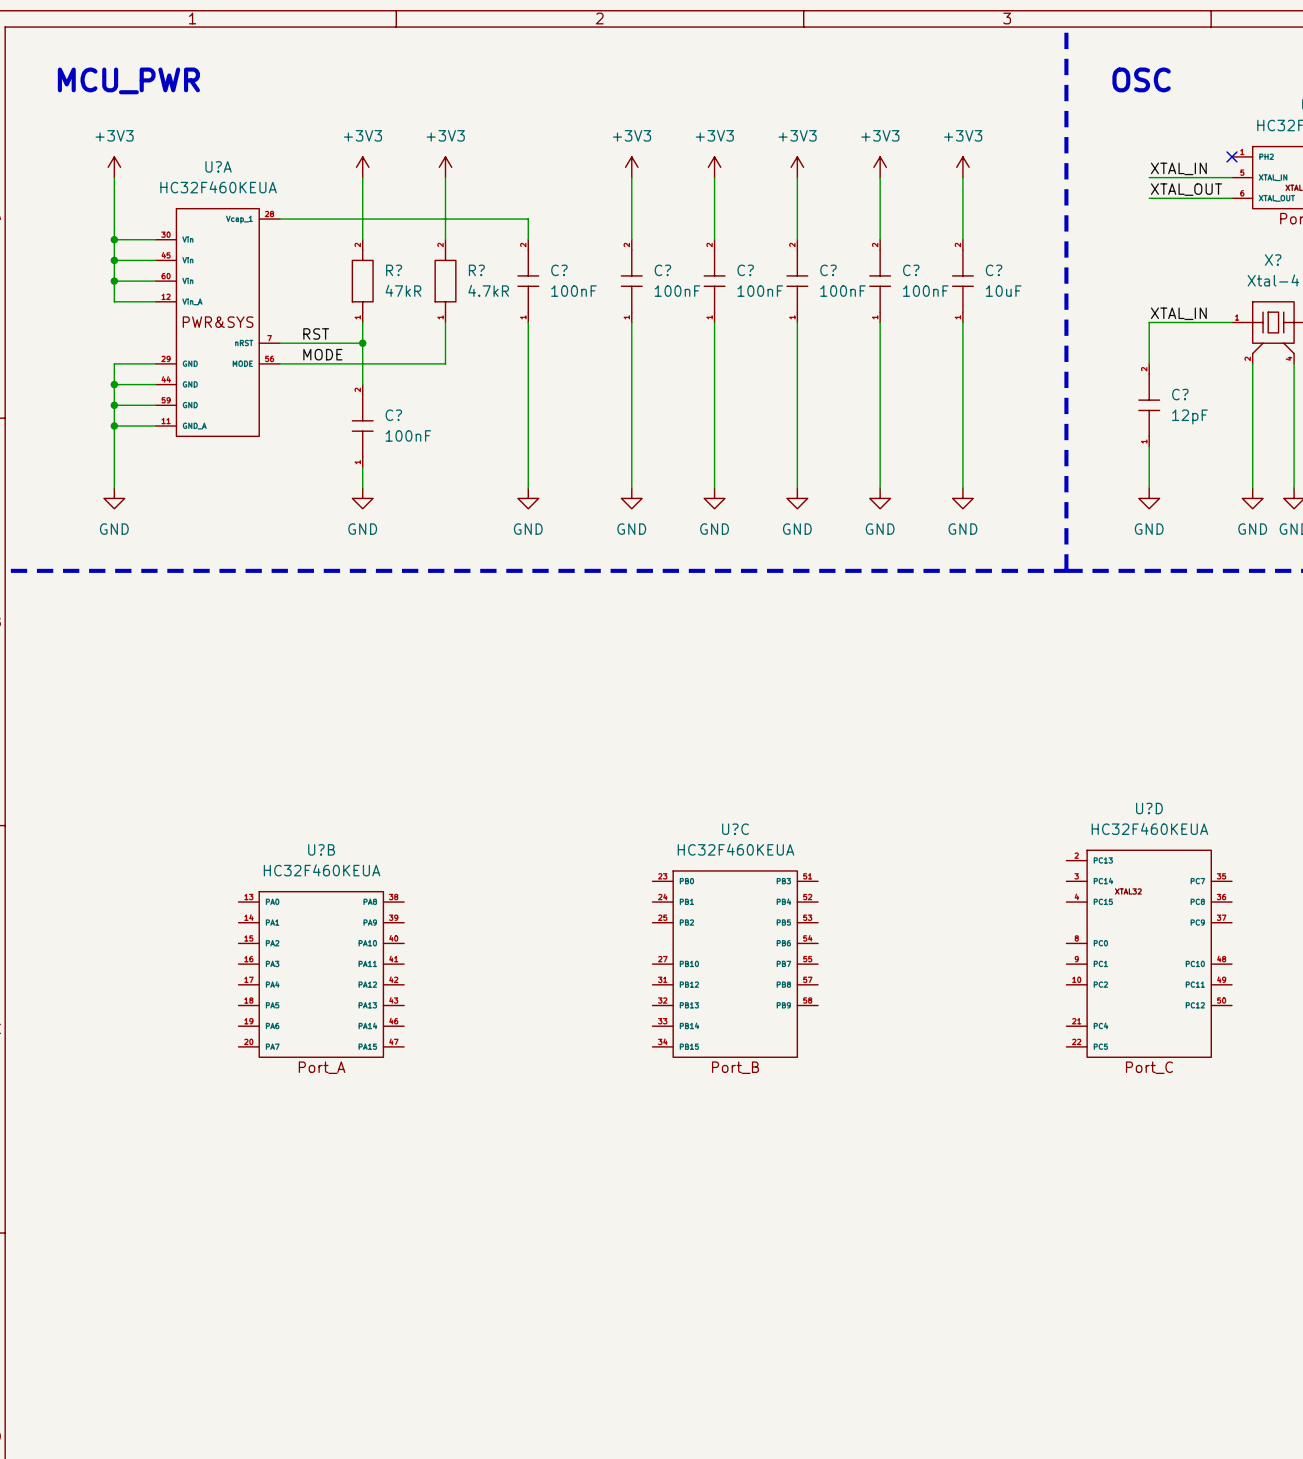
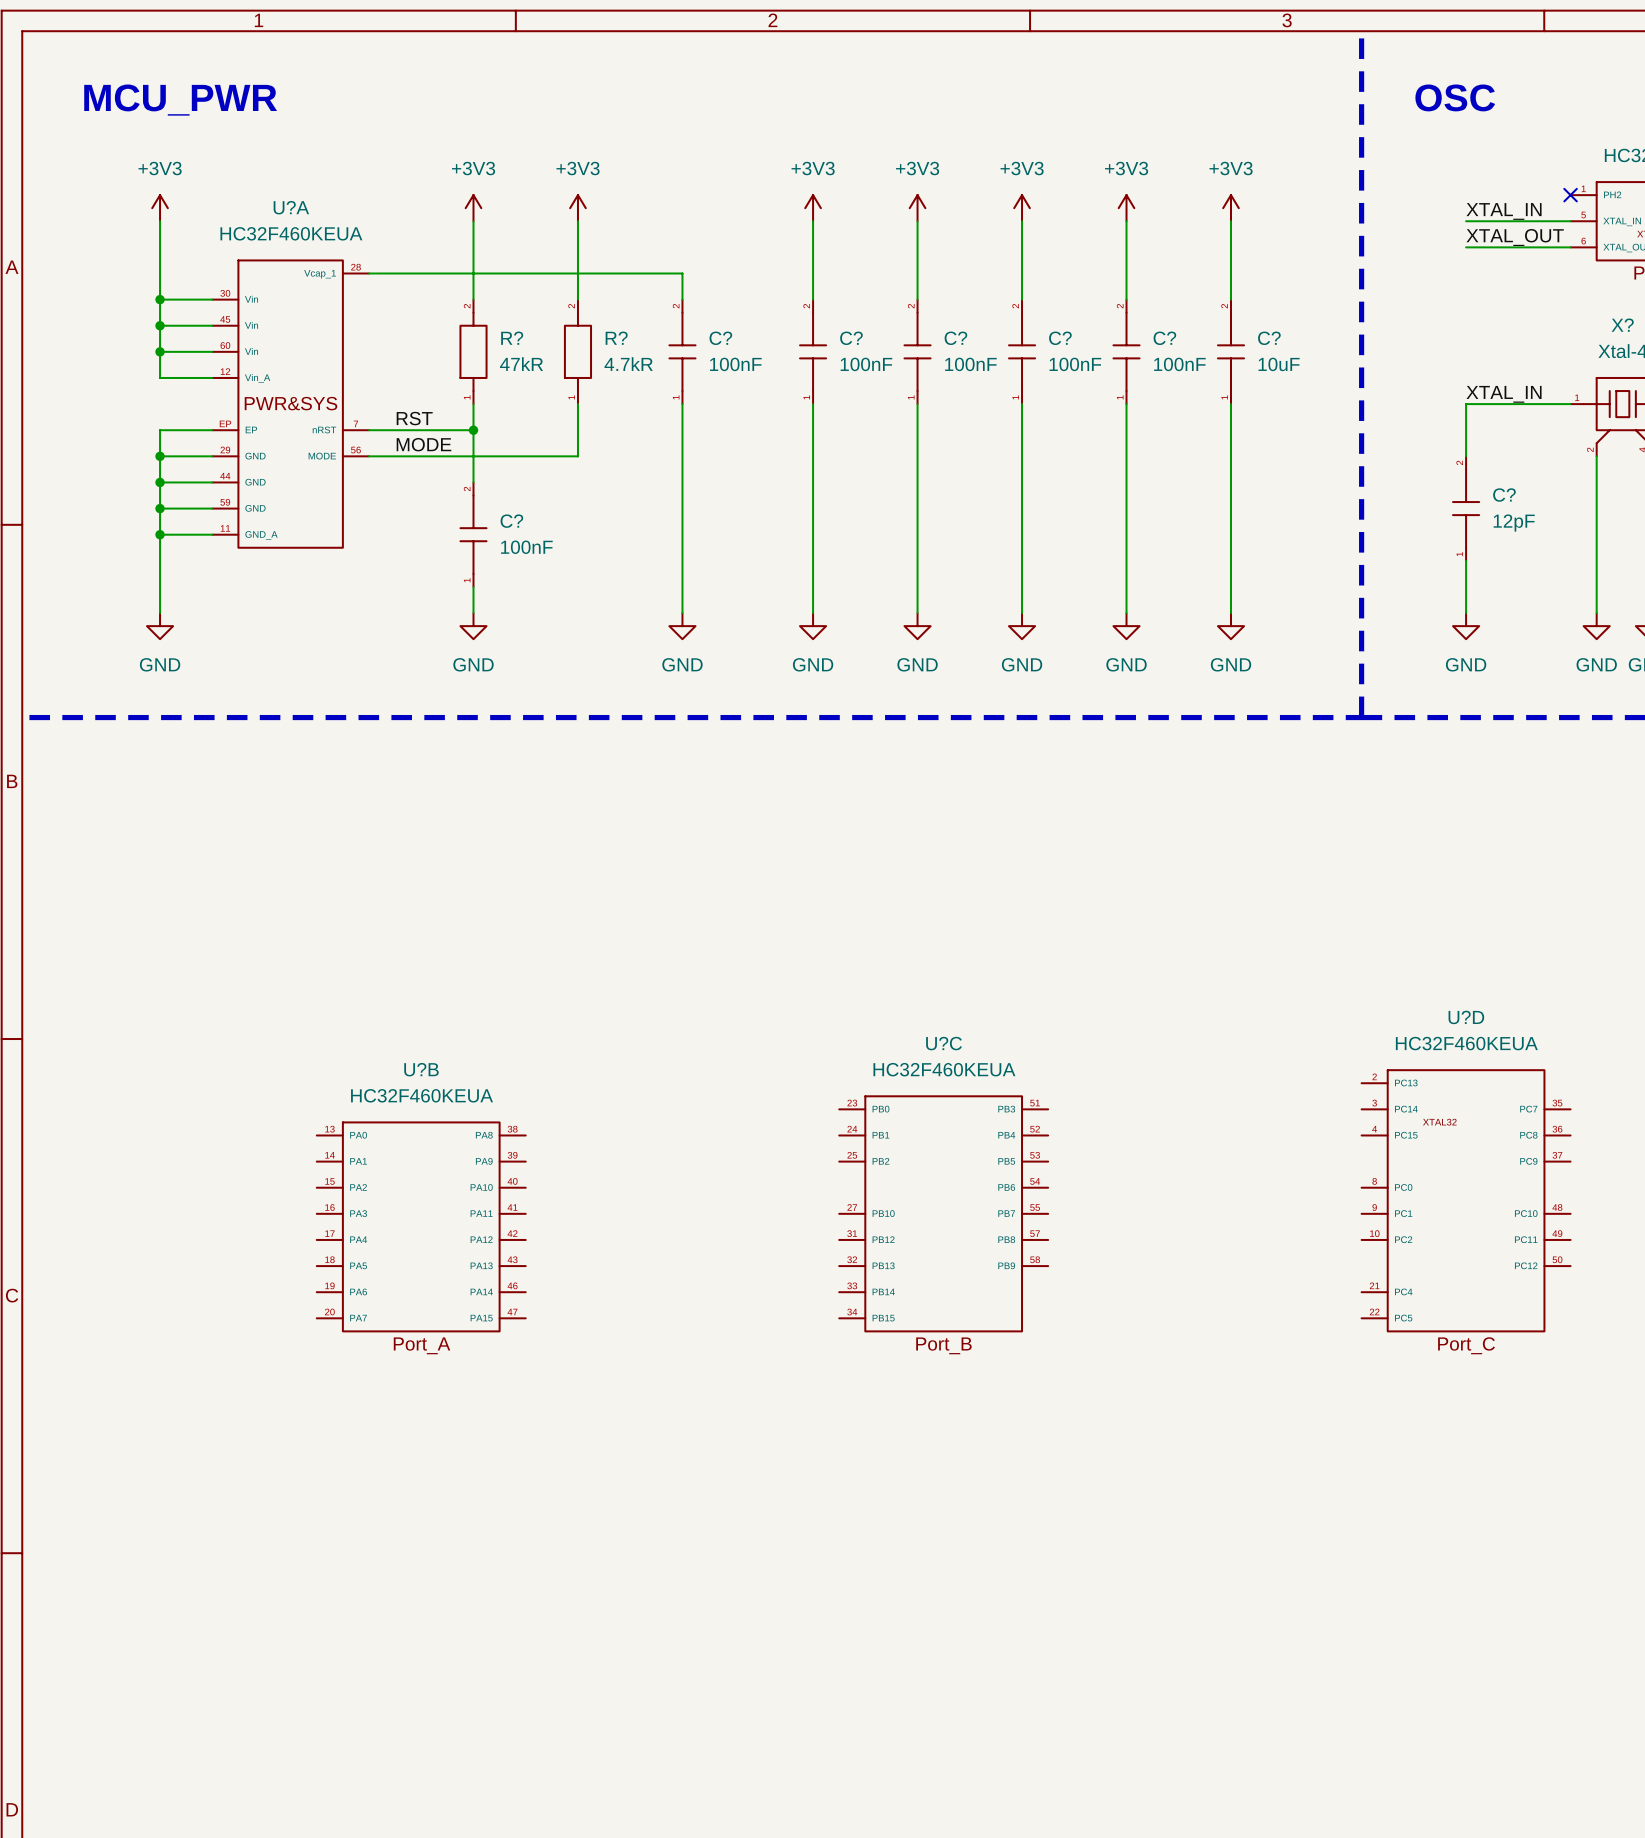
U?A symbol: [155, 208, 280, 437] -> [212, 260, 370, 548]
wire: none -> (212, 430) (160, 430) (160, 456)
junction: none -> (160, 456)

